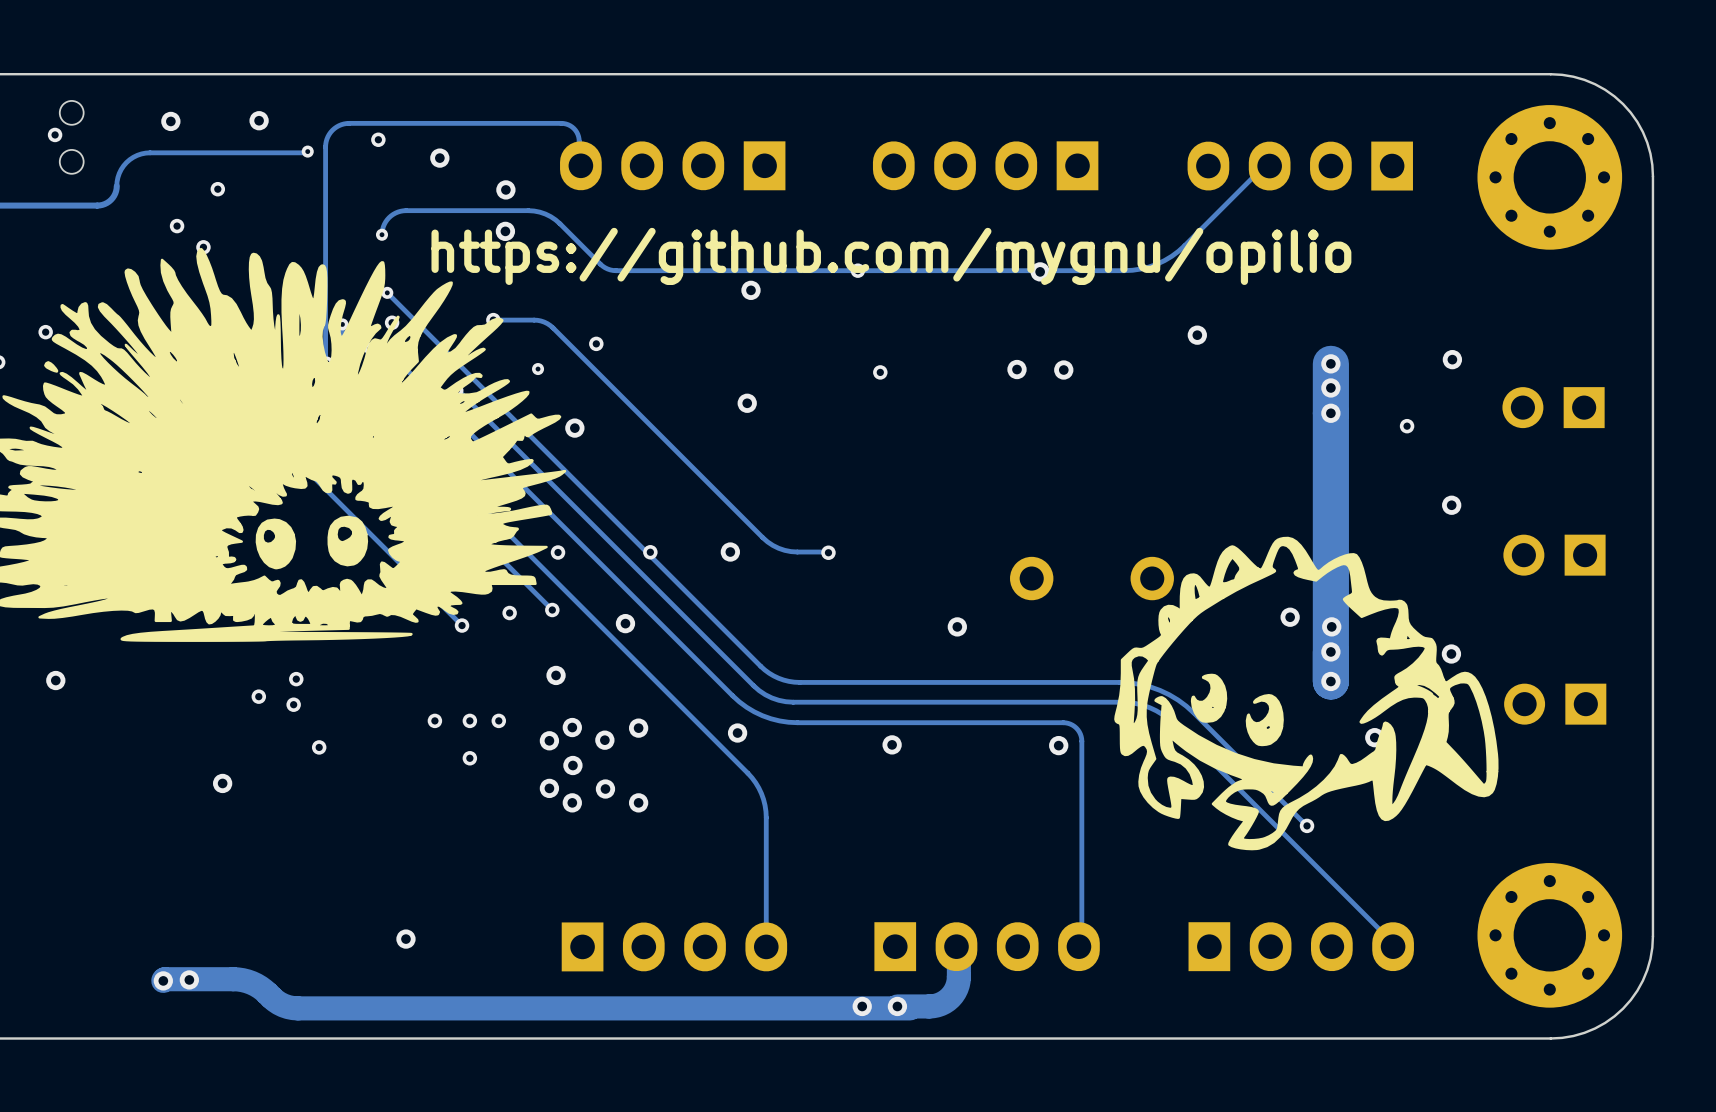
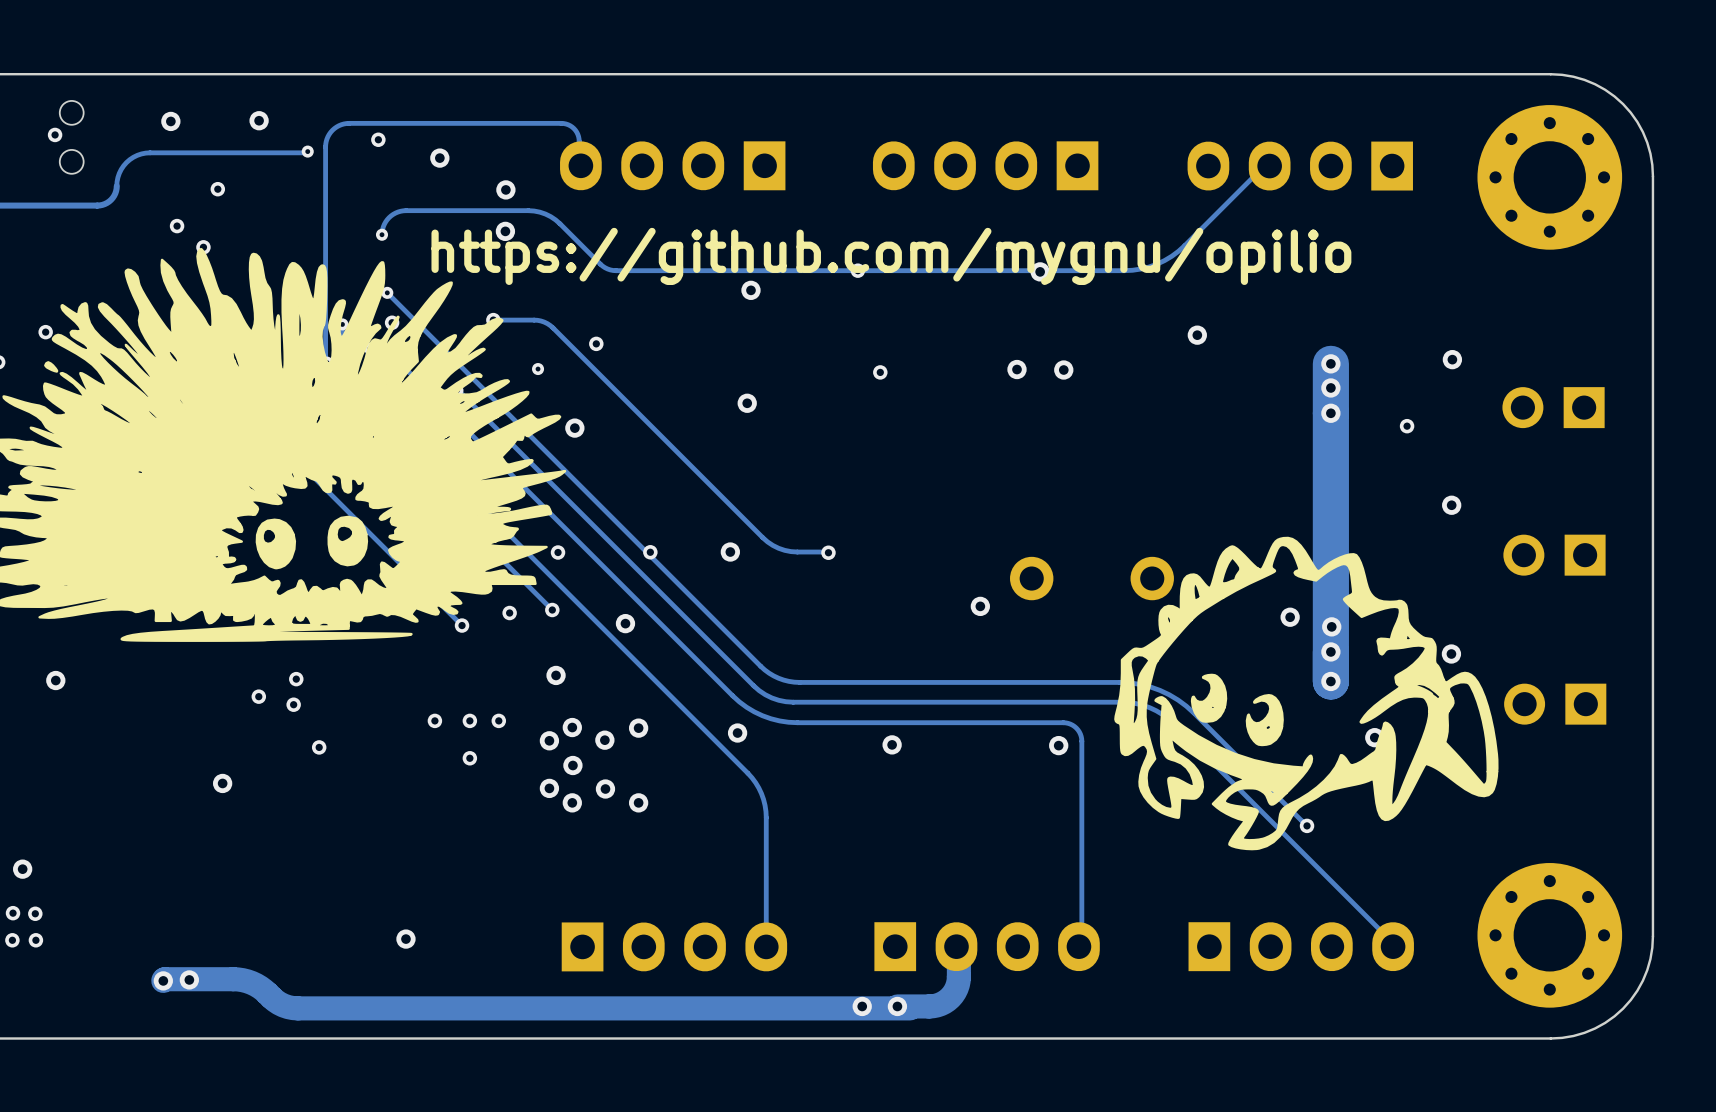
via position: (957, 626) -> (980, 606)
via: none -> (22, 869)
via: none -> (13, 913)
via: none -> (35, 913)
via: none -> (12, 940)
via: none -> (35, 940)

